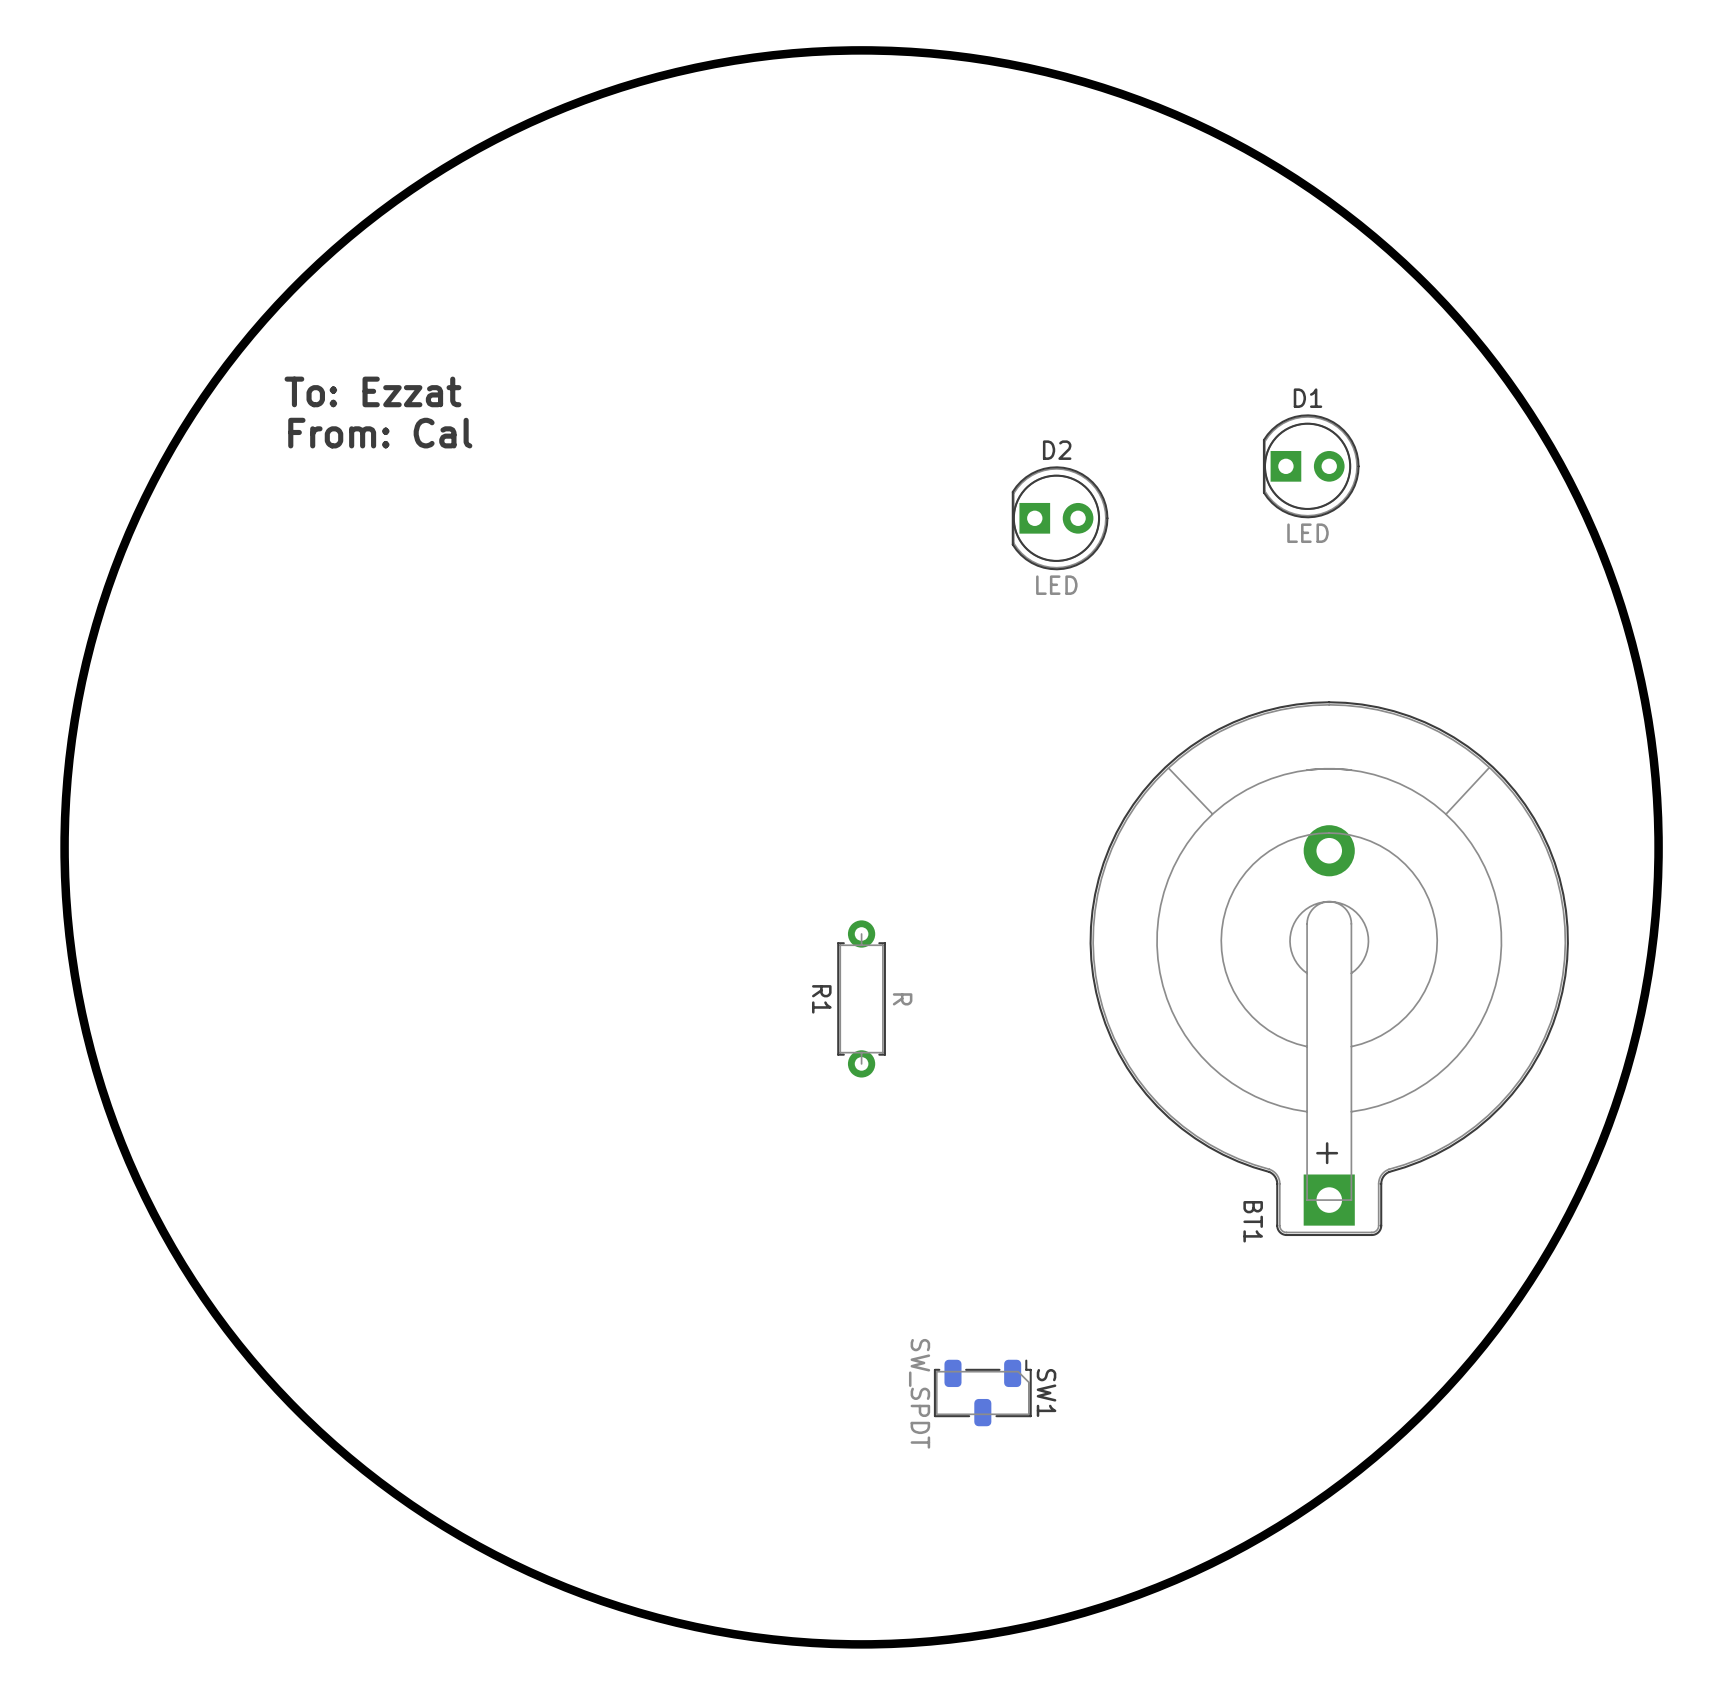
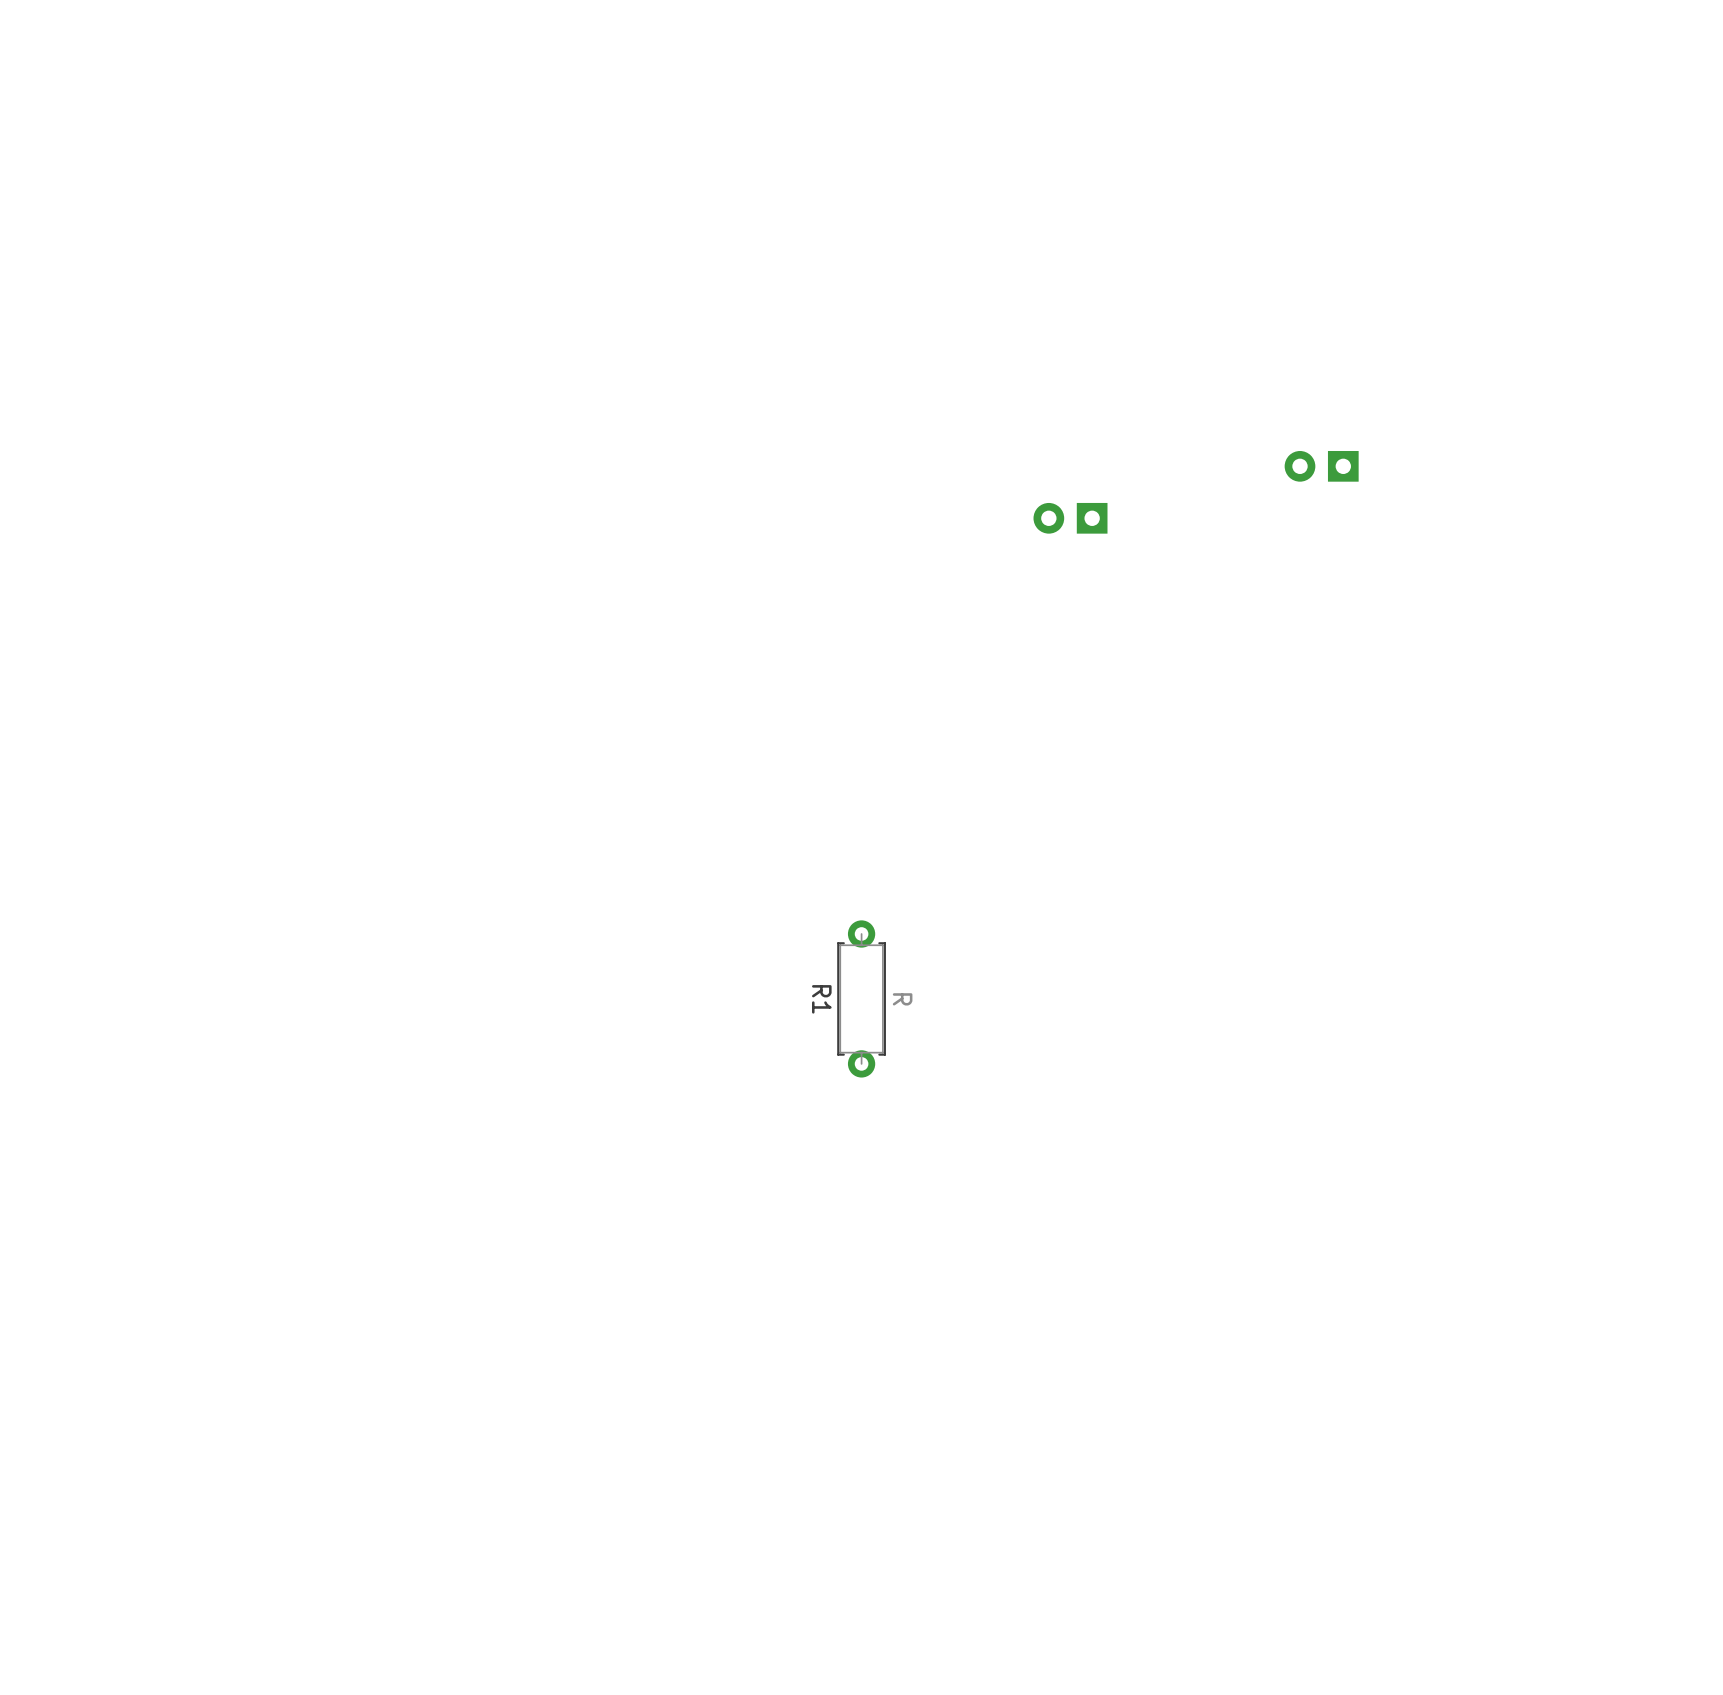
round board edge: [60, 46, 1663, 1649] -> none
text: To: Ezzat (372, 391) -> none
text: From: Cal (380, 433) -> none
D1 side: bottom (1311, 466) -> top (1321, 466)
D2 side: bottom (1060, 518) -> top (1070, 518)
BT1: (1329, 968) -> none
SW1: SW_SPDT (982, 1392) -> none

